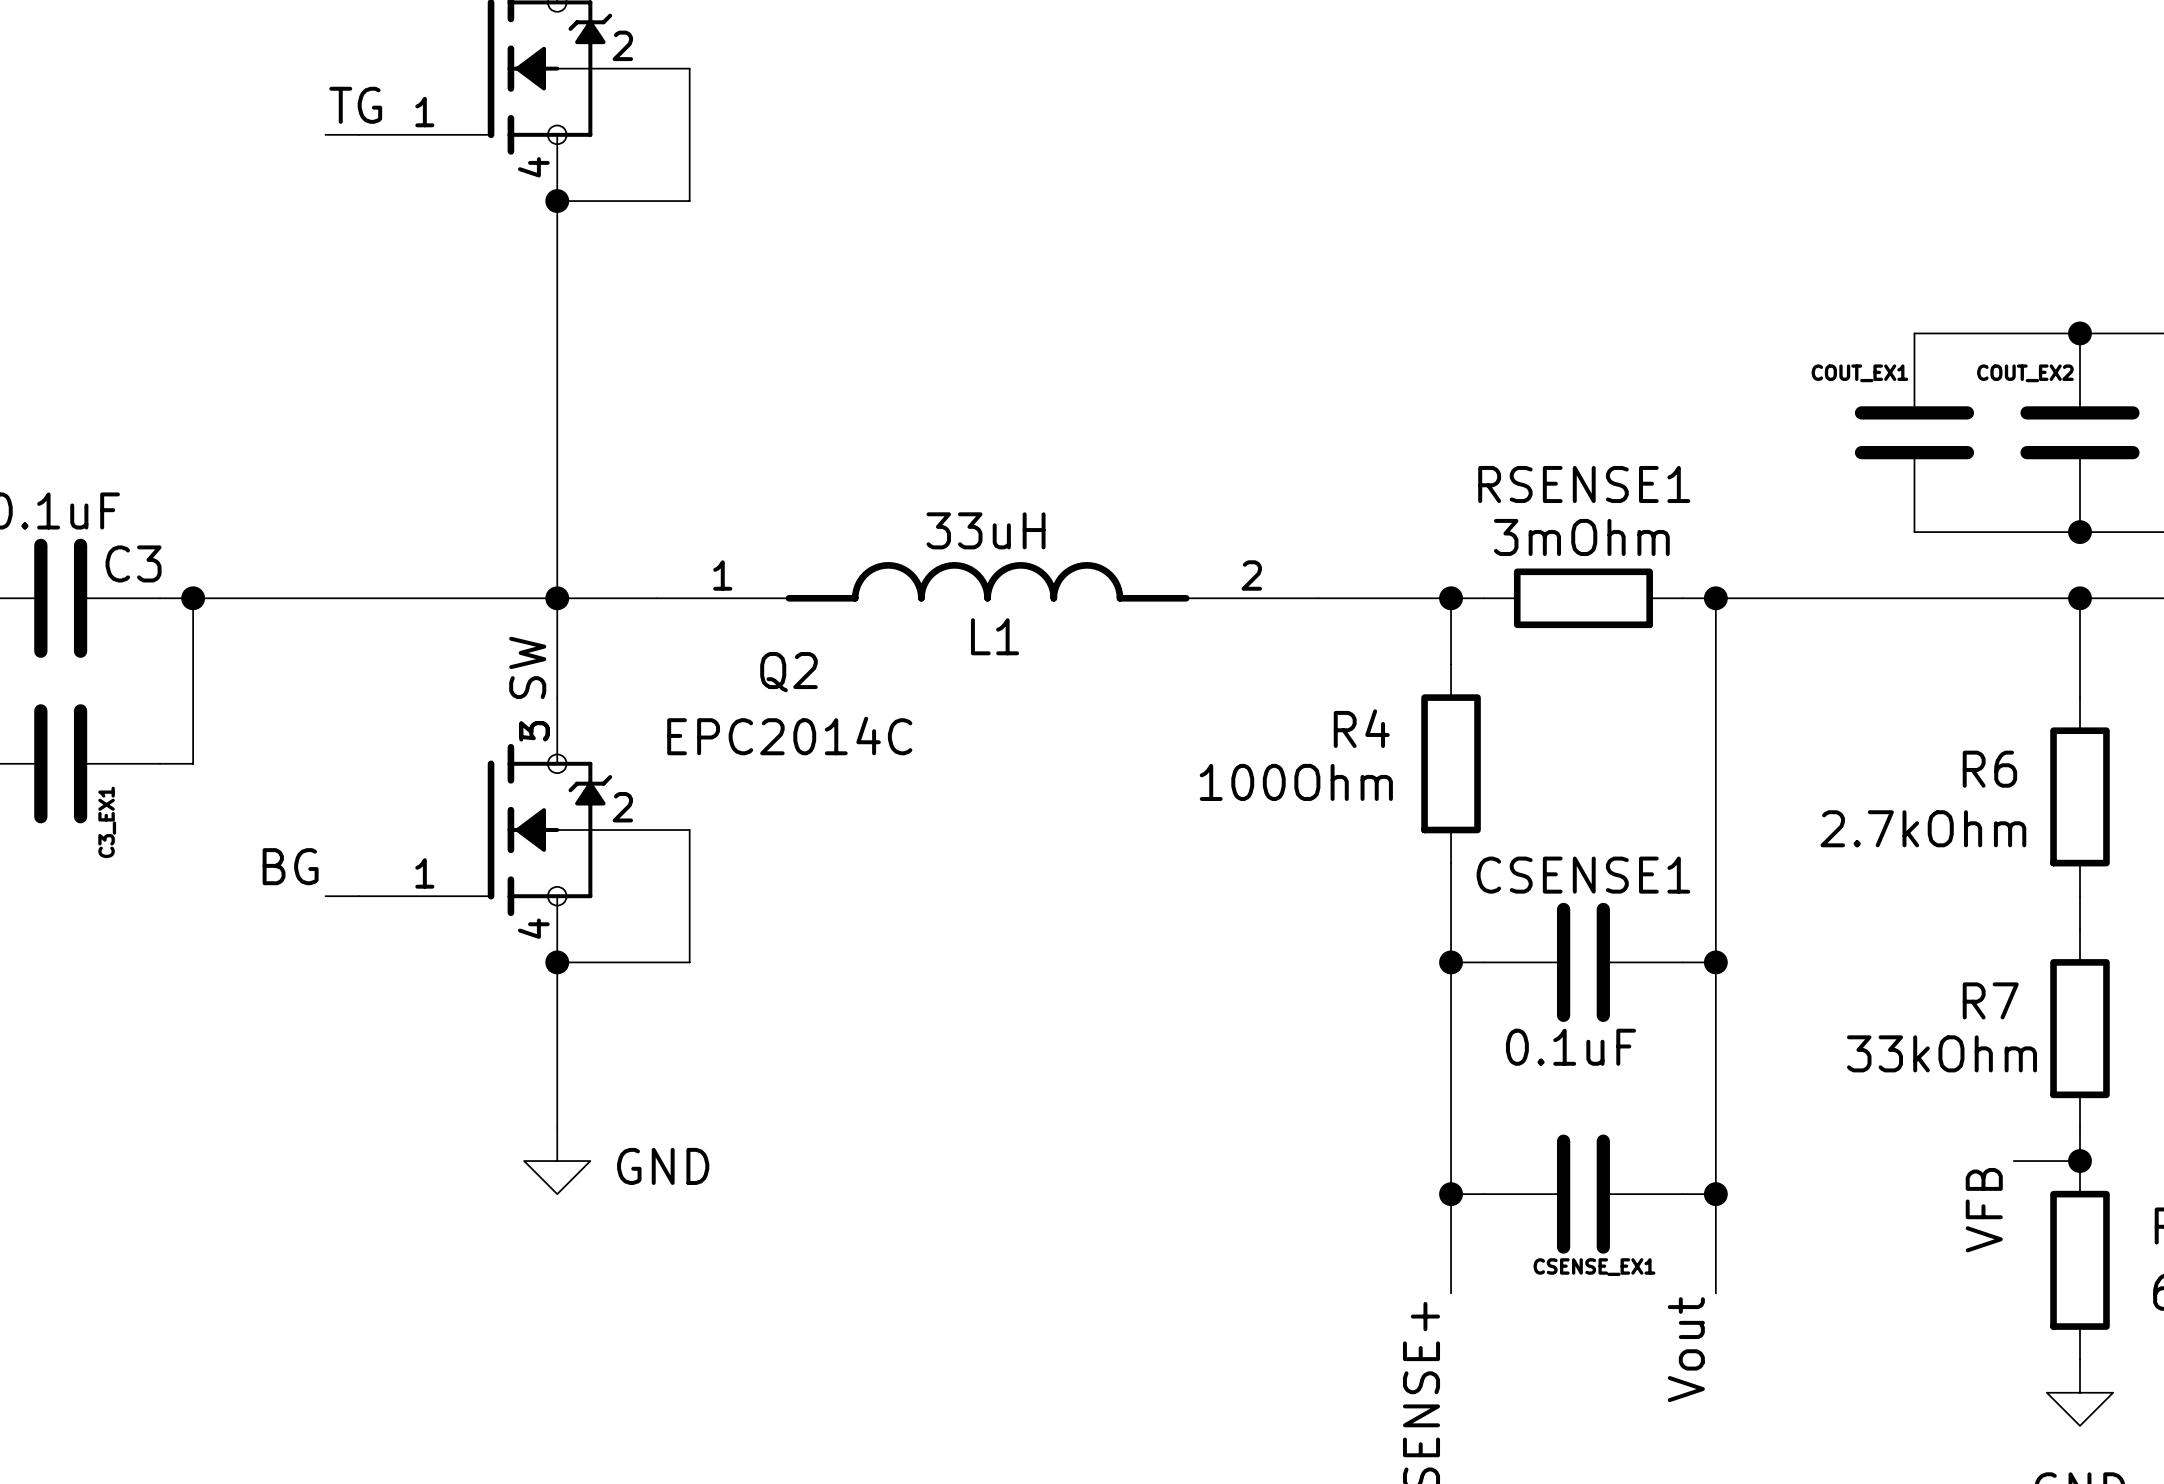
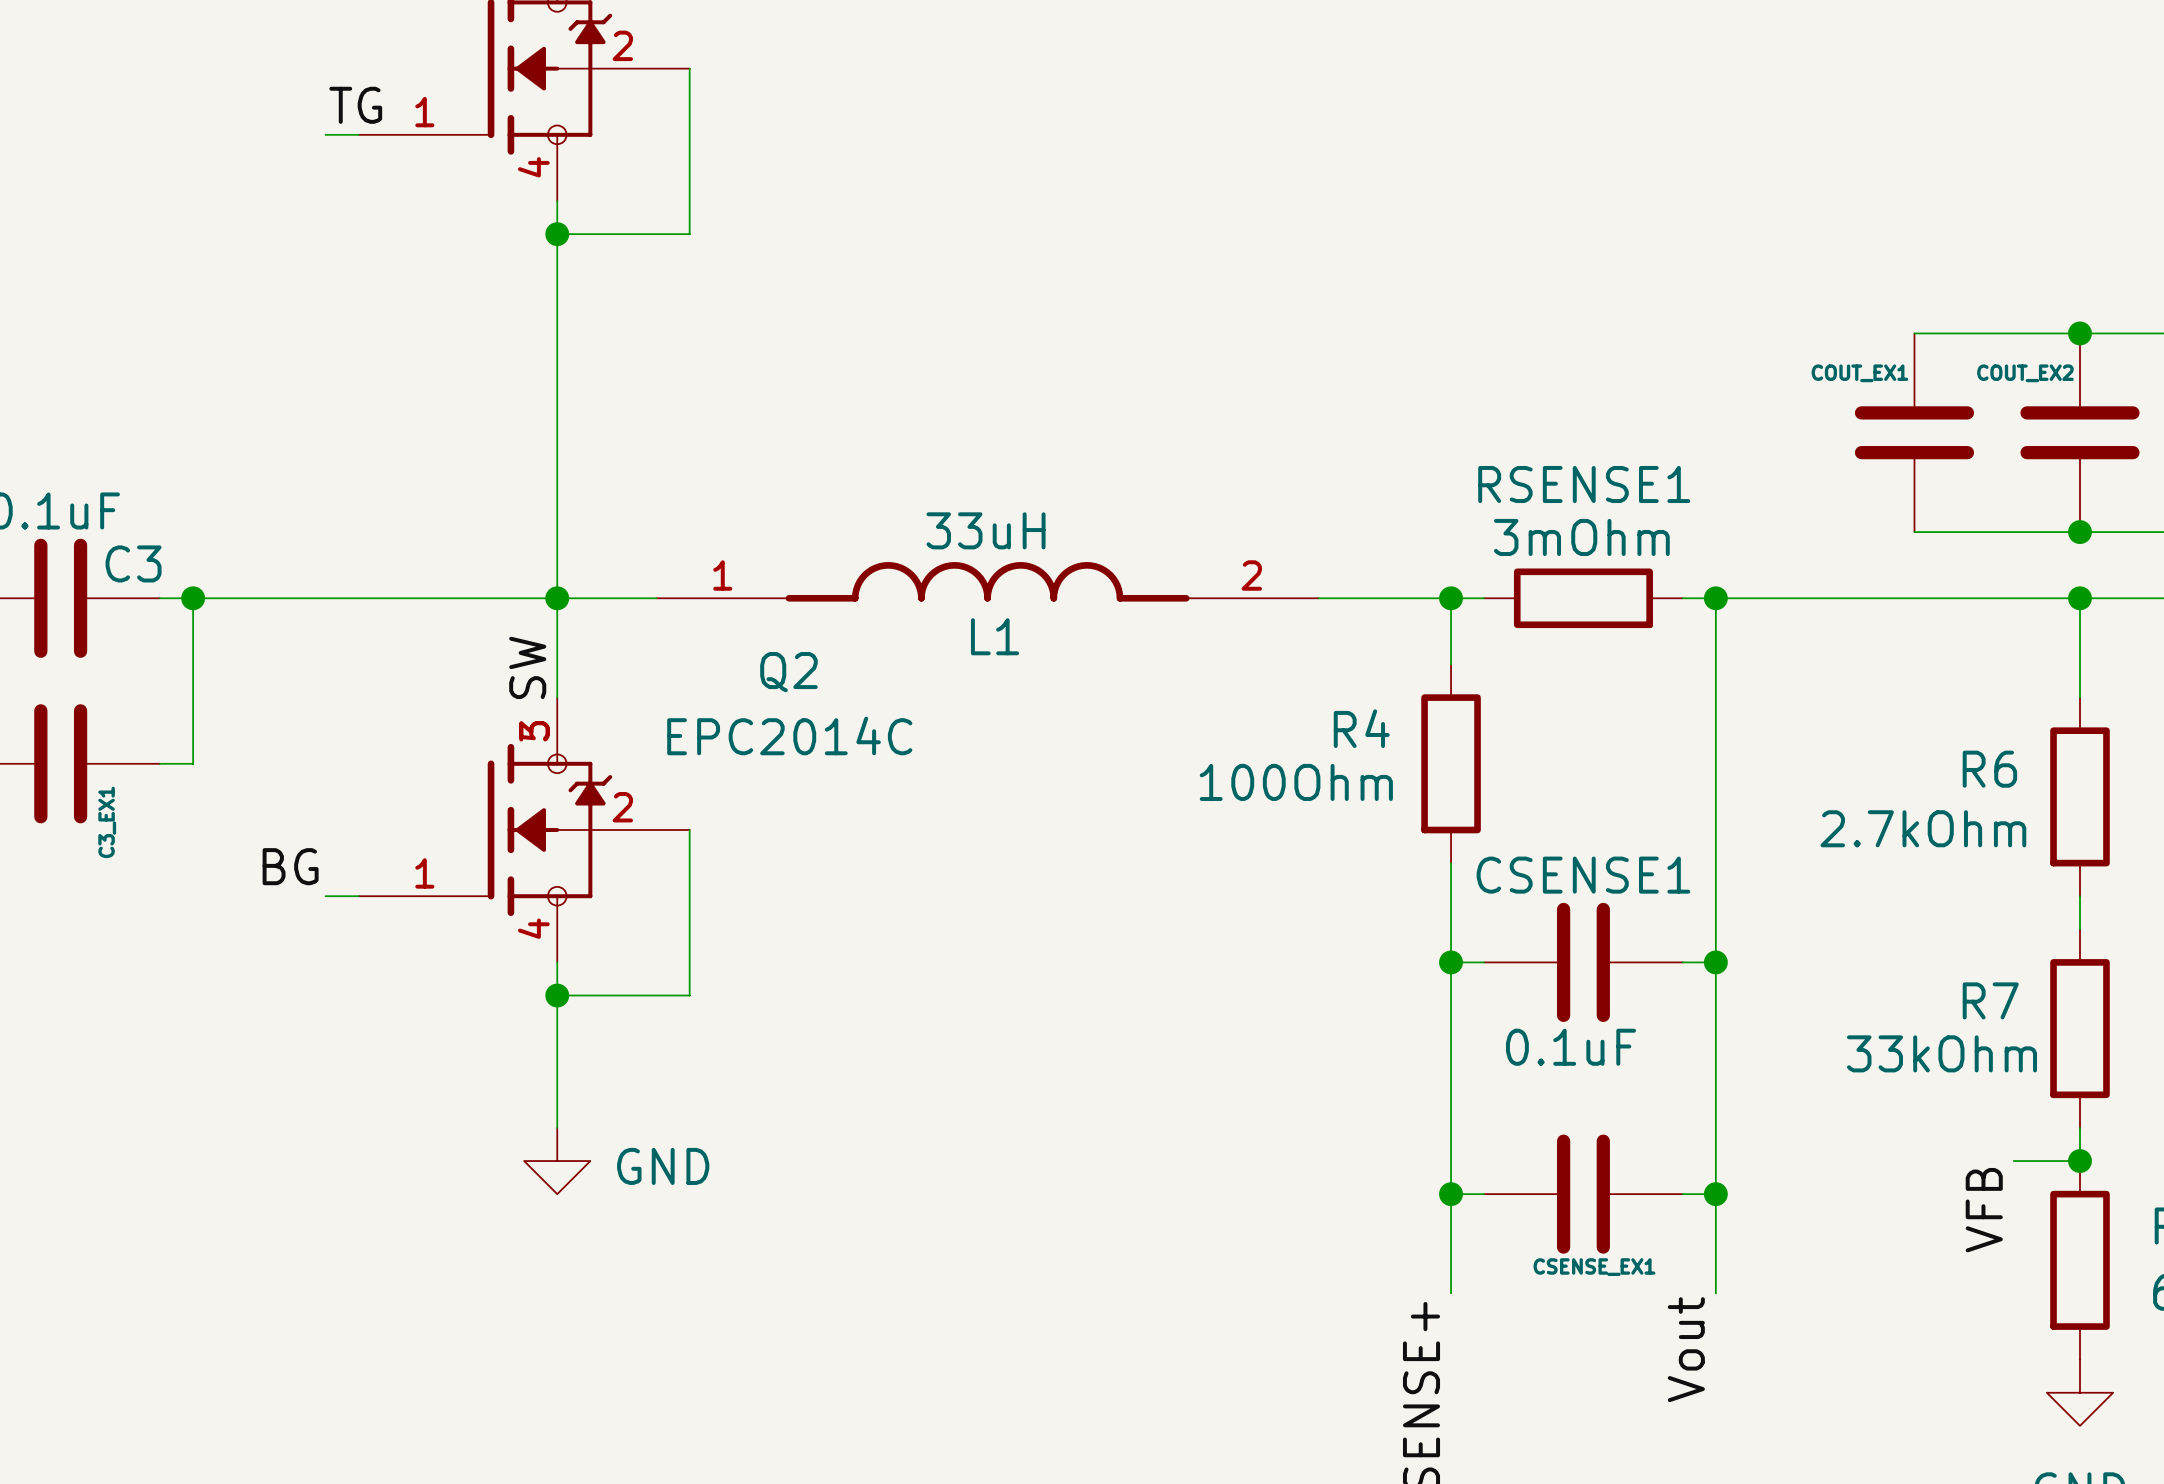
wire: (557, 201) (689, 201) -> (557, 234) (689, 234) (689, 201)
junction position: (557, 201) -> (557, 234)
wire: (557, 962) (689, 962) -> (557, 995) (689, 995) (689, 962)
junction position: (557, 962) -> (557, 995)

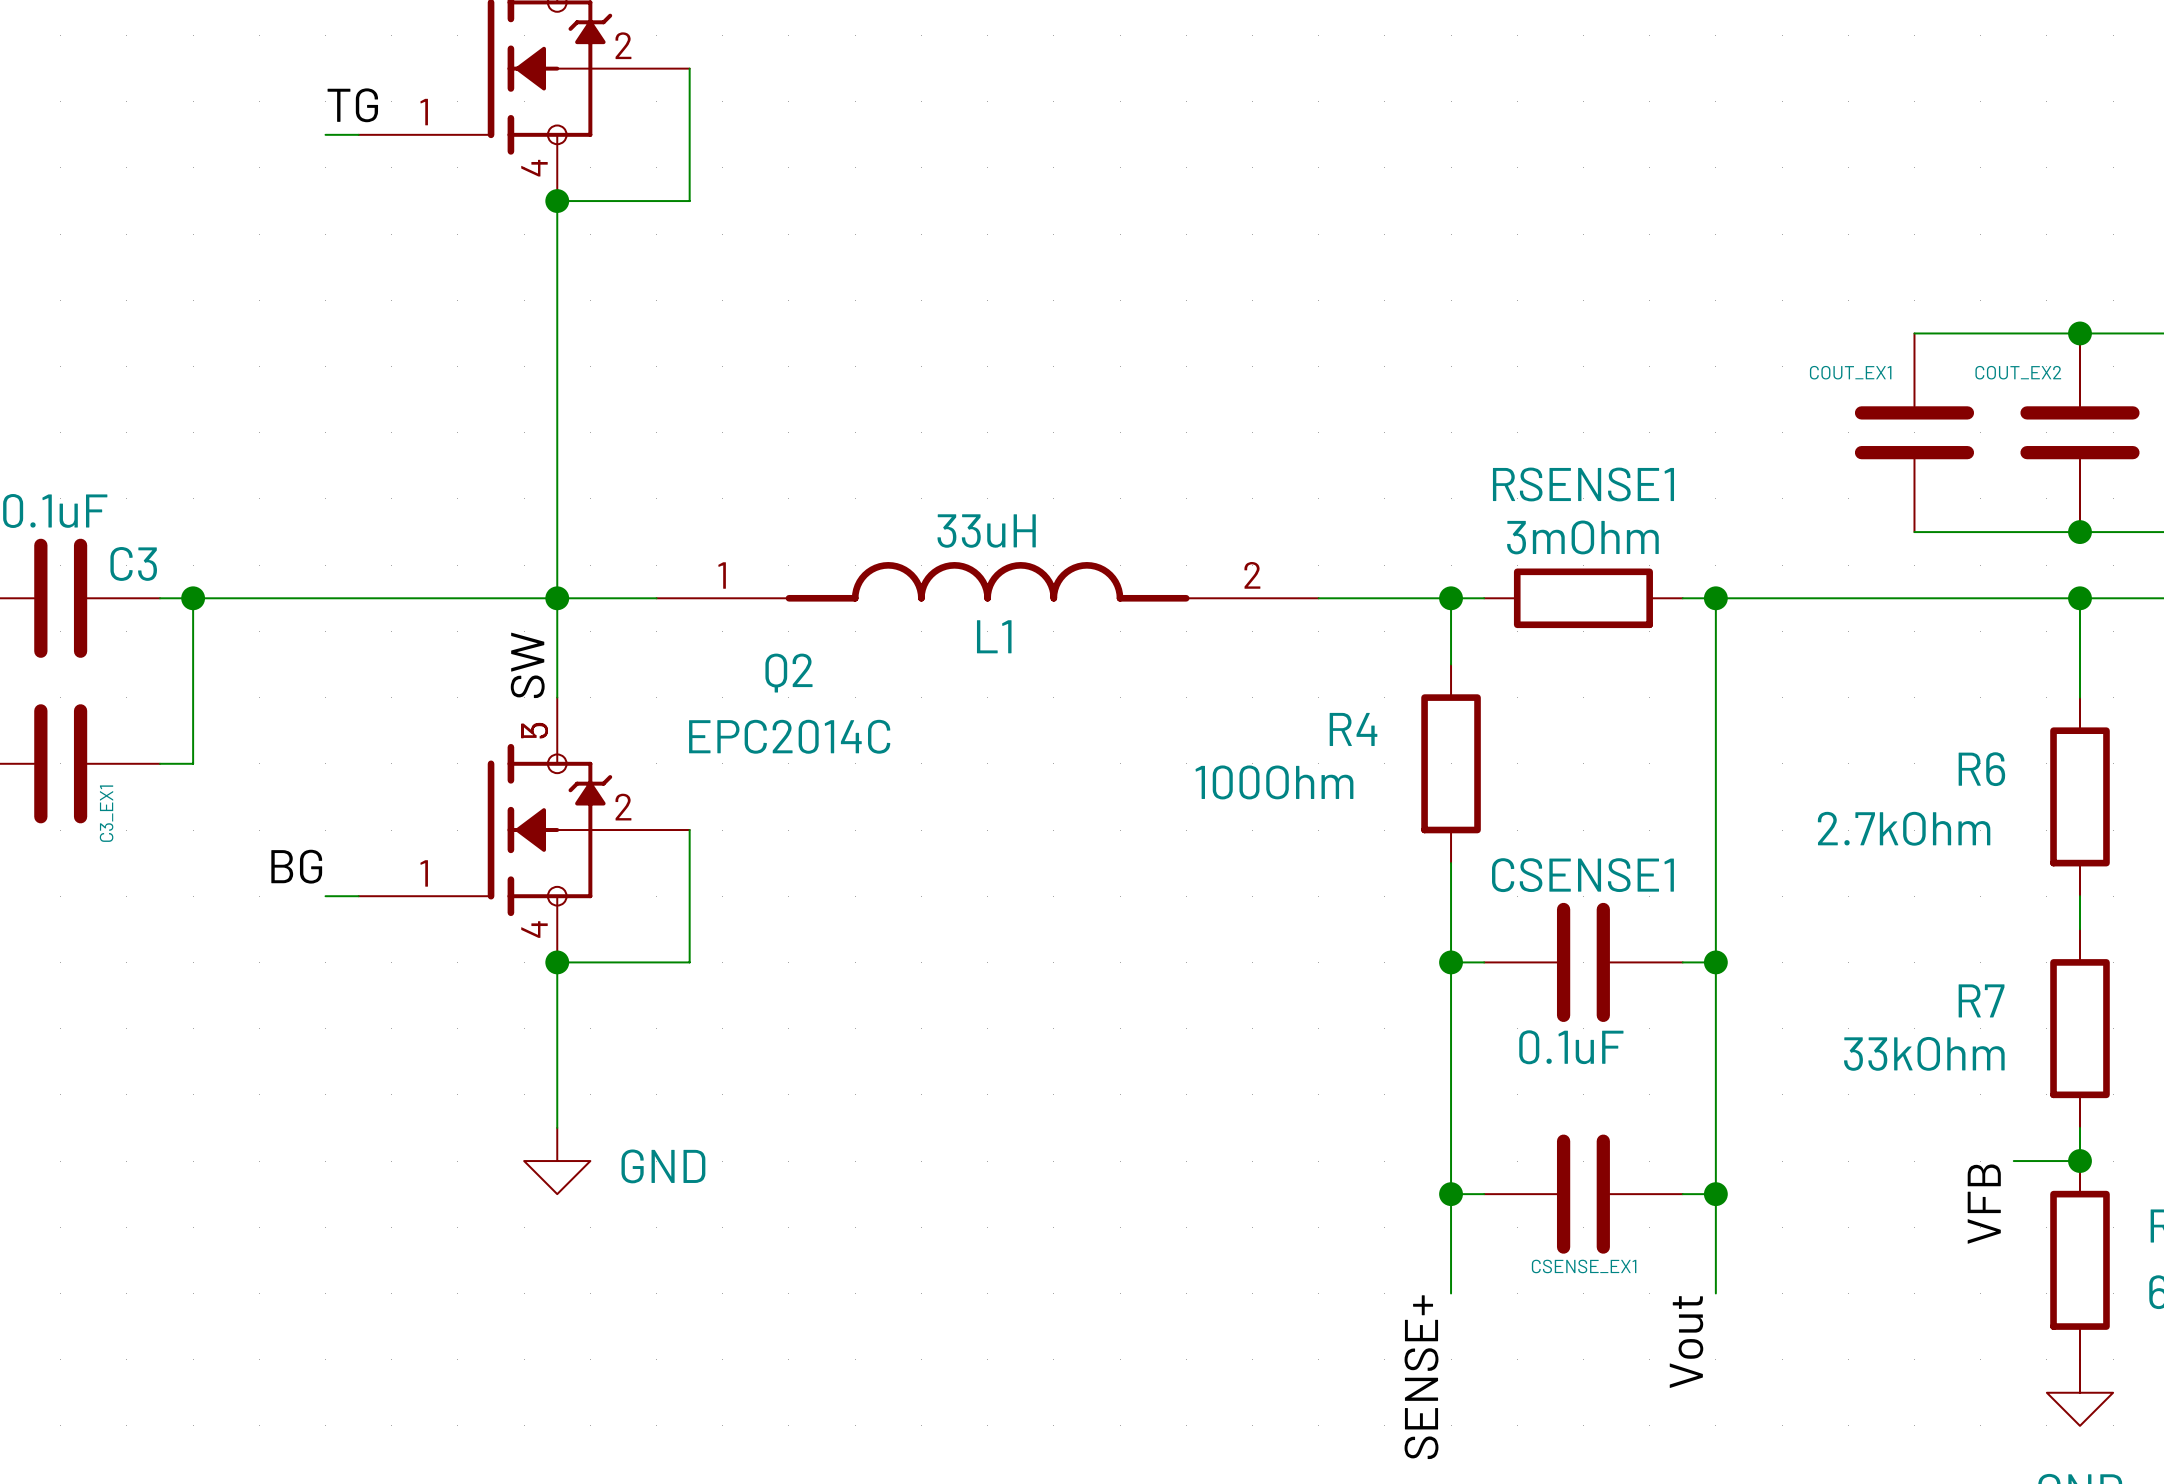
wire: (689, 201) (689, 234) (557, 234) -> (689, 201) (557, 201)
junction position: (557, 234) -> (557, 201)
wire: (689, 962) (689, 995) (557, 995) -> (689, 962) (557, 962)
junction position: (557, 995) -> (557, 962)

